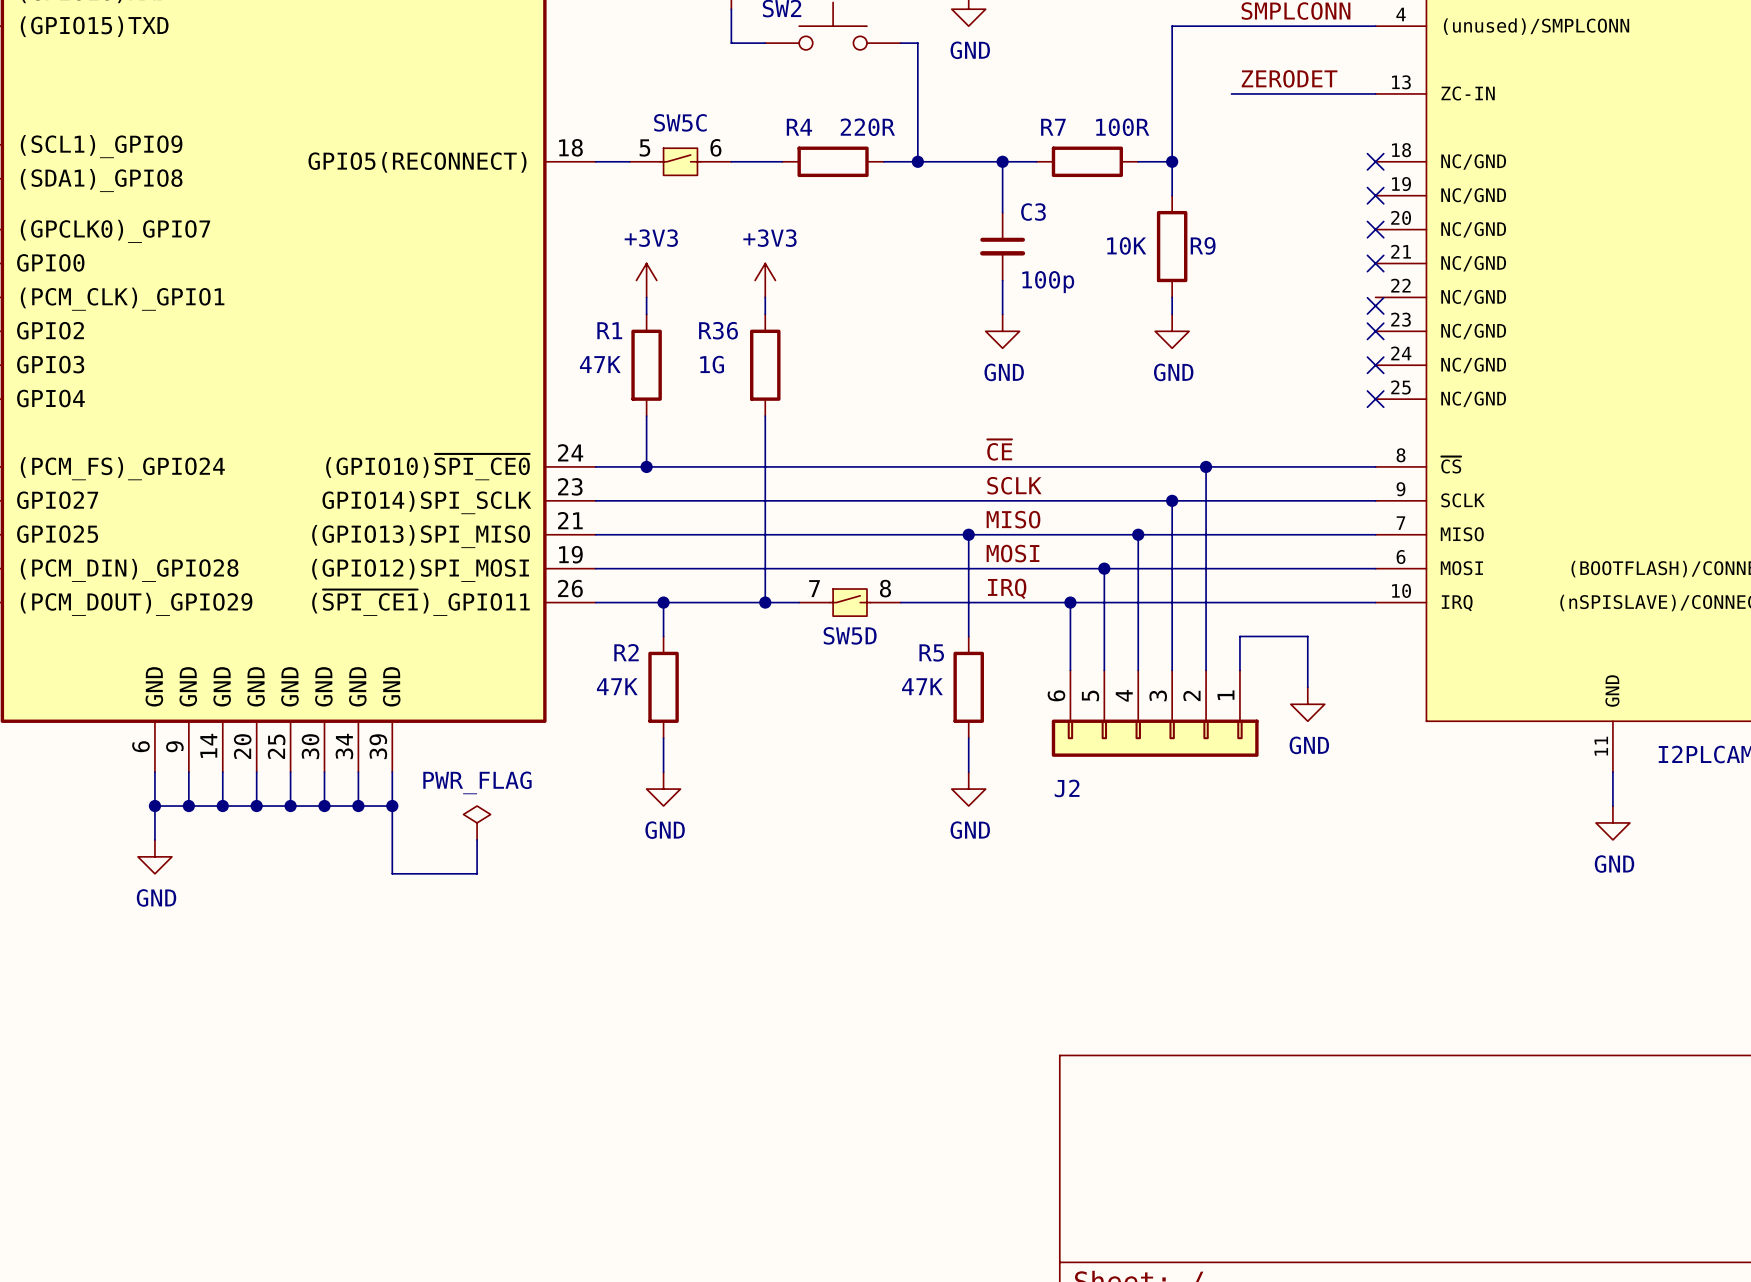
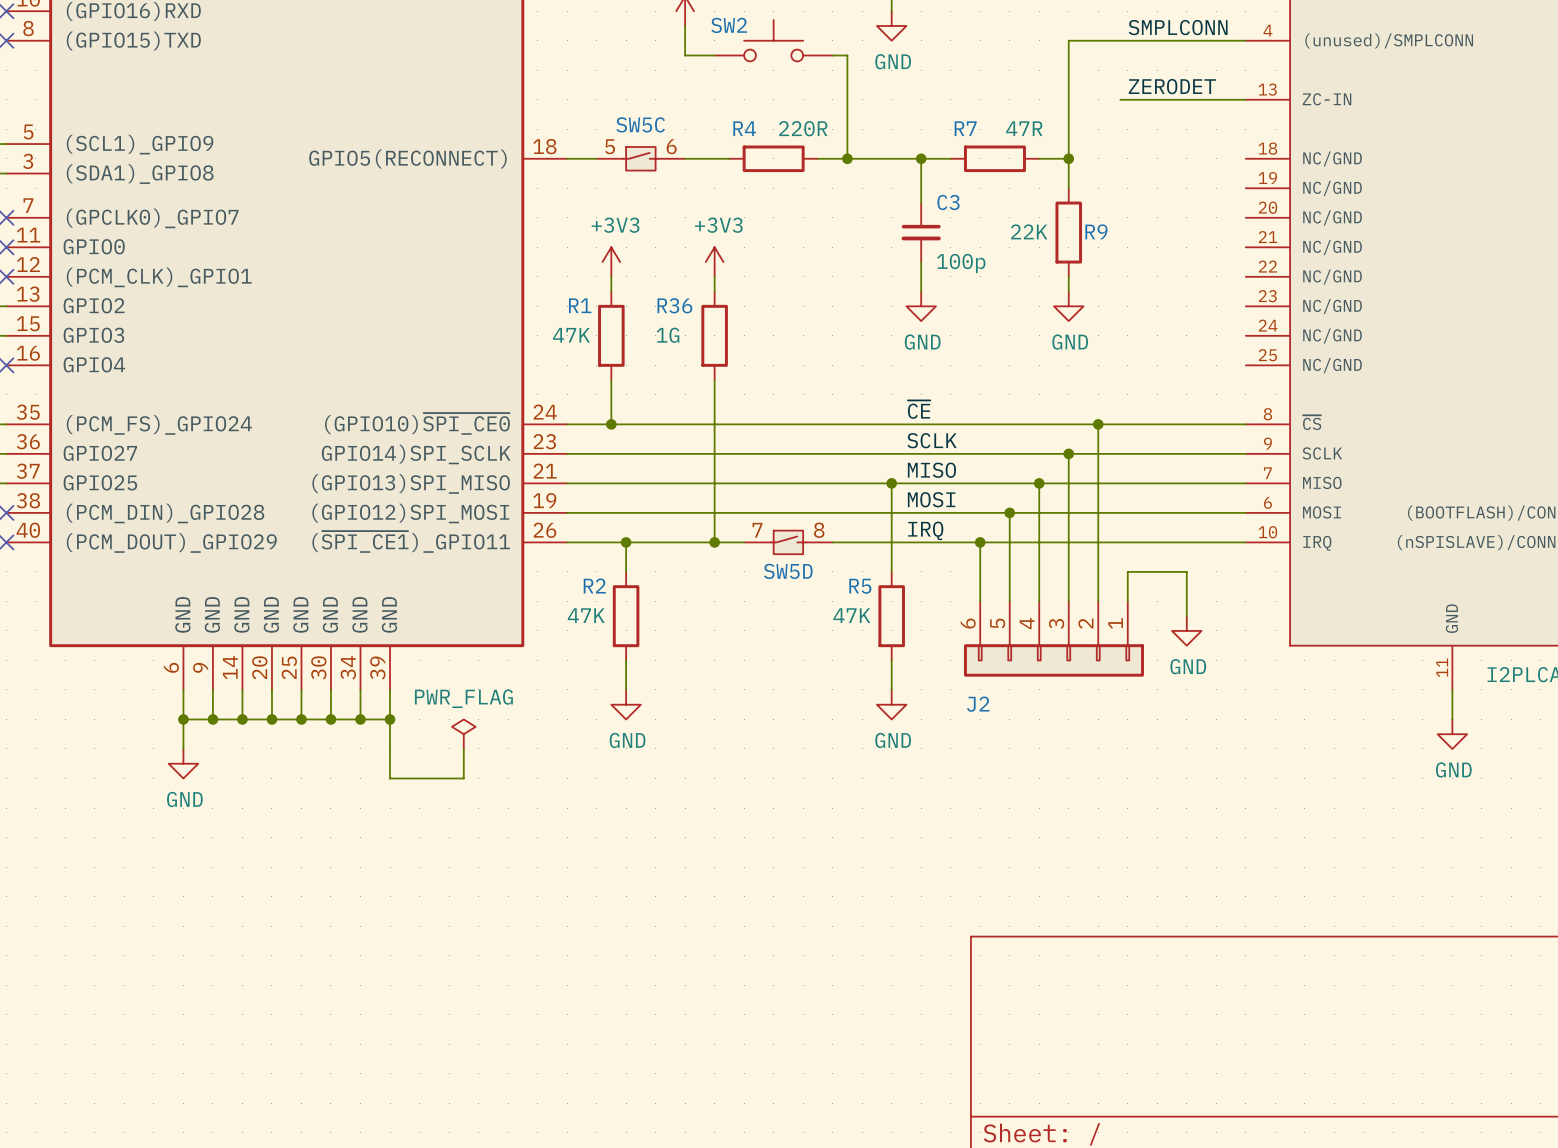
R7 value: 100R (1122, 127) -> 47R (1024, 128)
no-connect mark: (1375, 161) -> none
no-connect mark: (1375, 195) -> none
no-connect mark: (1375, 229) -> none
R9 value: 10K (1126, 245) -> 22K (1029, 231)
no-connect mark: (1375, 263) -> none
no-connect mark: (1375, 305) -> none
no-connect mark: (1375, 331) -> none
no-connect mark: (1375, 365) -> none
no-connect mark: (1375, 399) -> none

